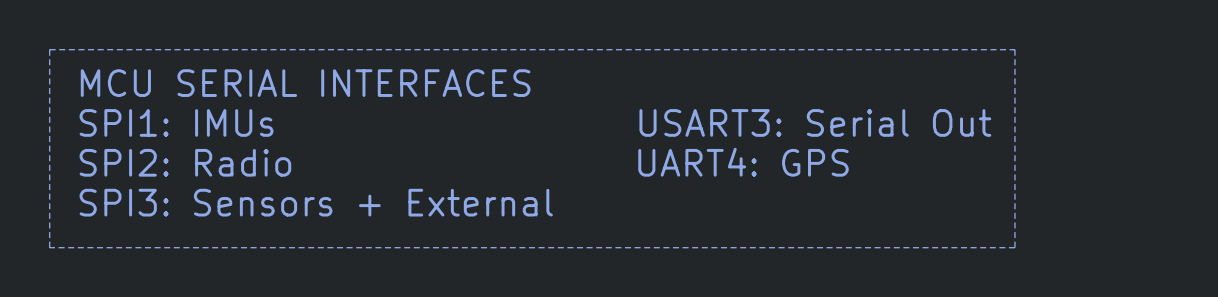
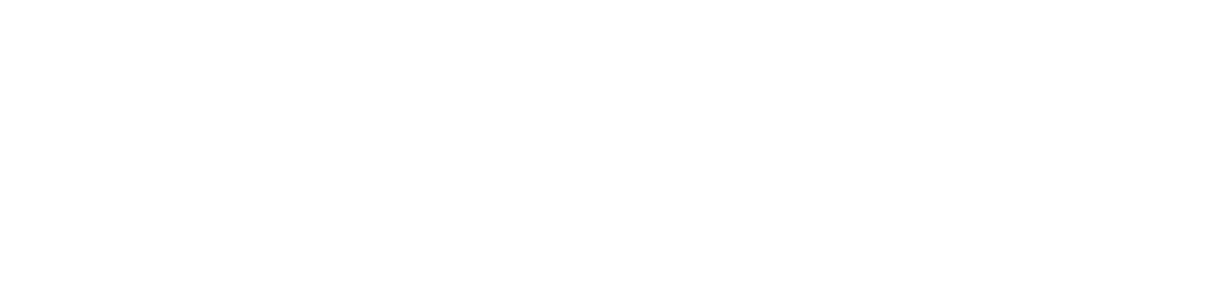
line: (49, 49) (1014, 49) (1014, 247) (49, 247) (49, 49) -> none
text: MCU SERIAL INTERFACES (305, 83) -> none
text: SPI1: IMUs USART3: Serial Out (535, 122) -> none
text: SPI2: Radio UART4: GPS (464, 162) -> none
text: SPI3: Sensors + External (316, 202) -> none

